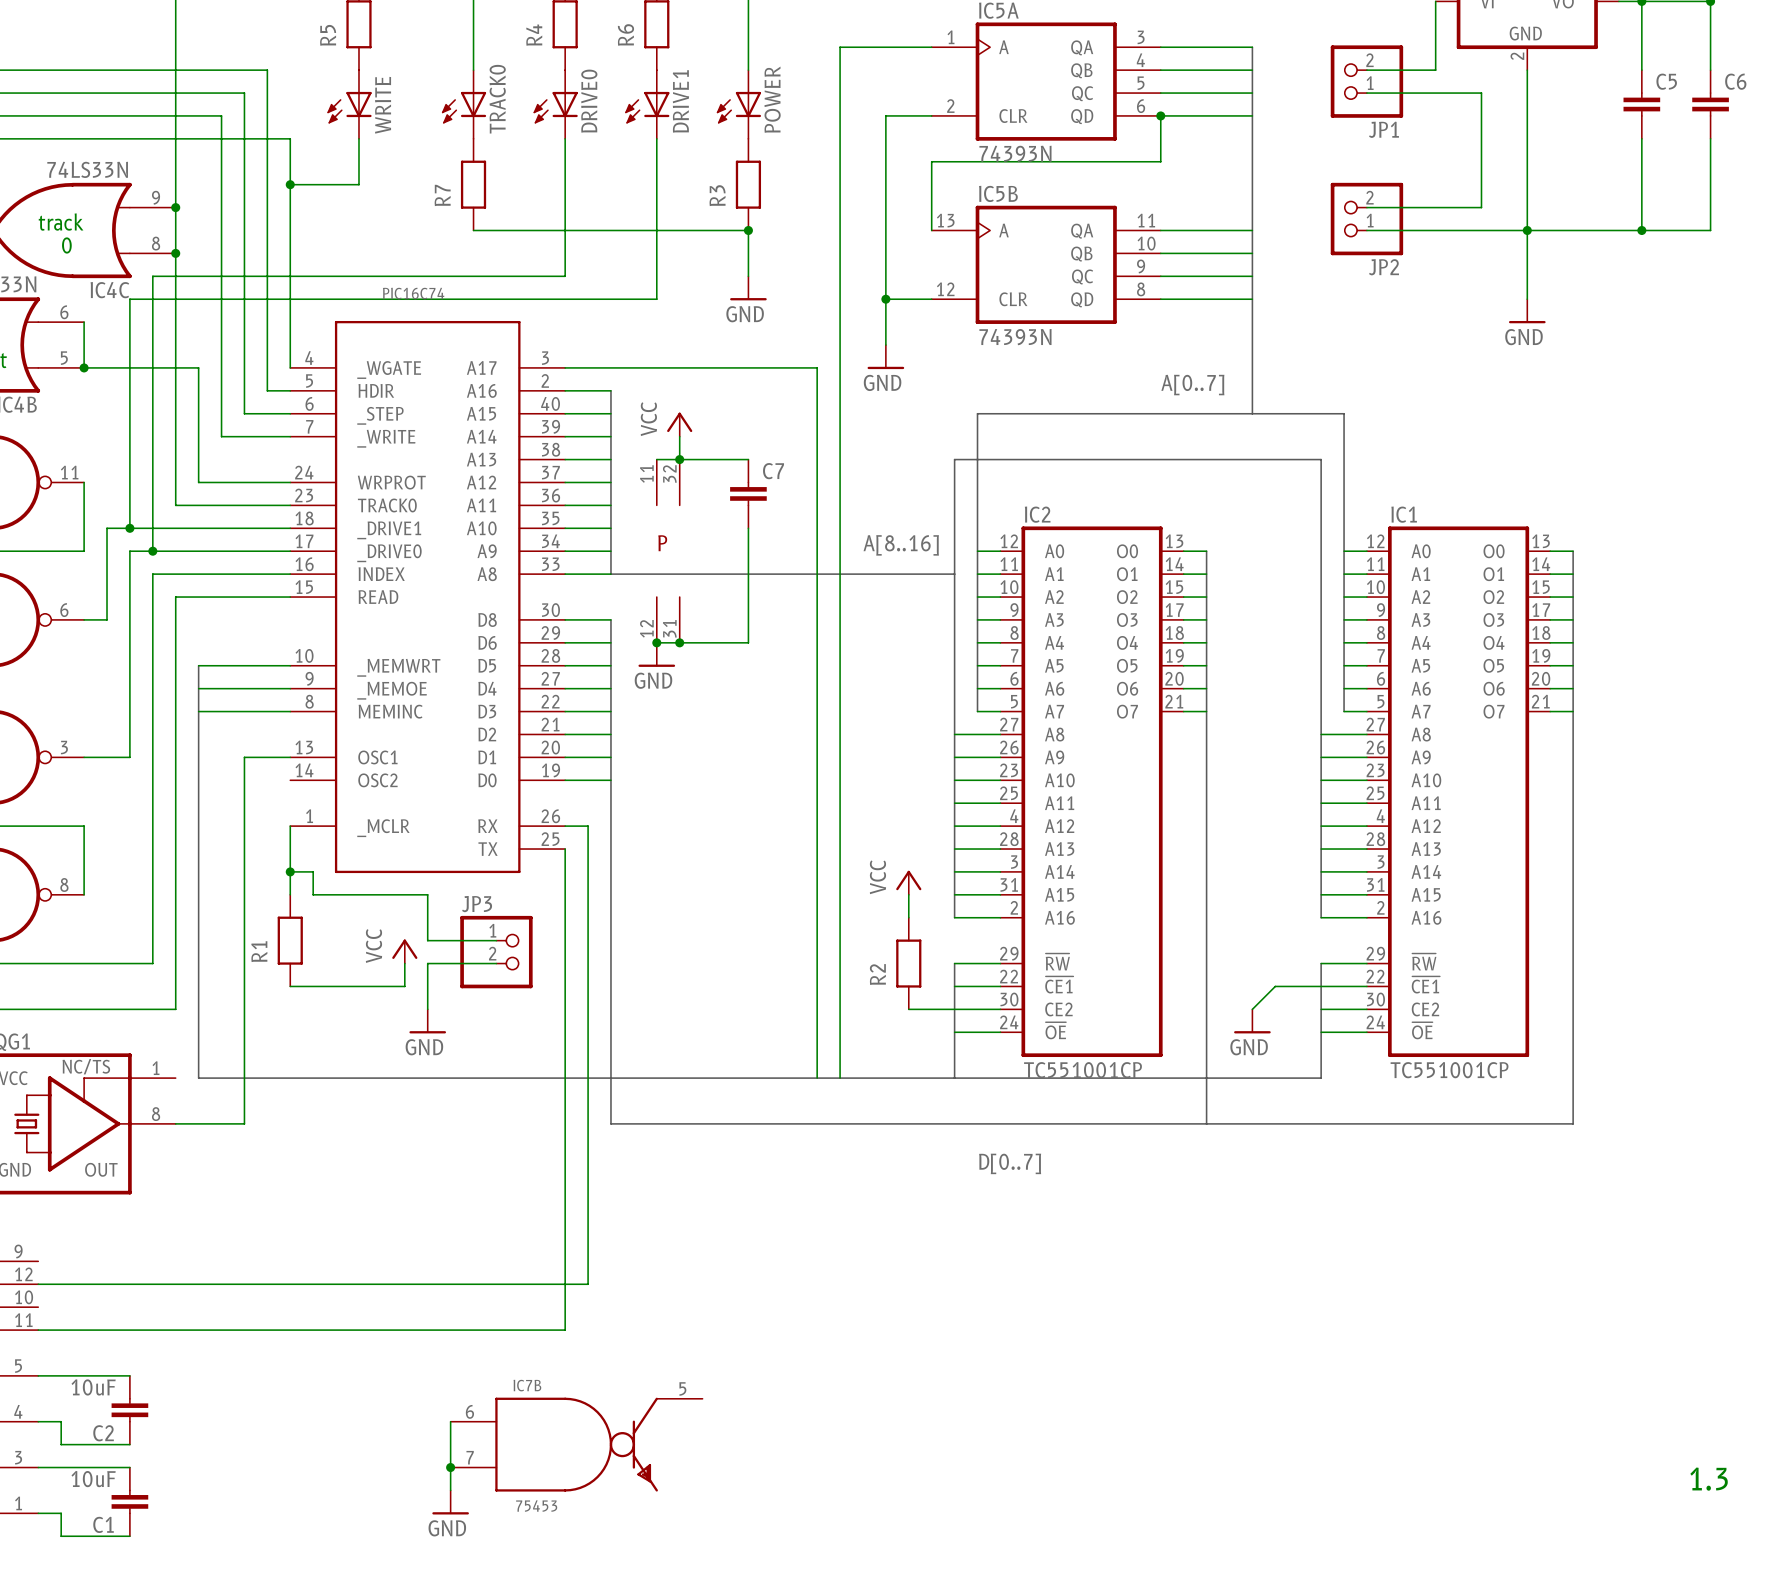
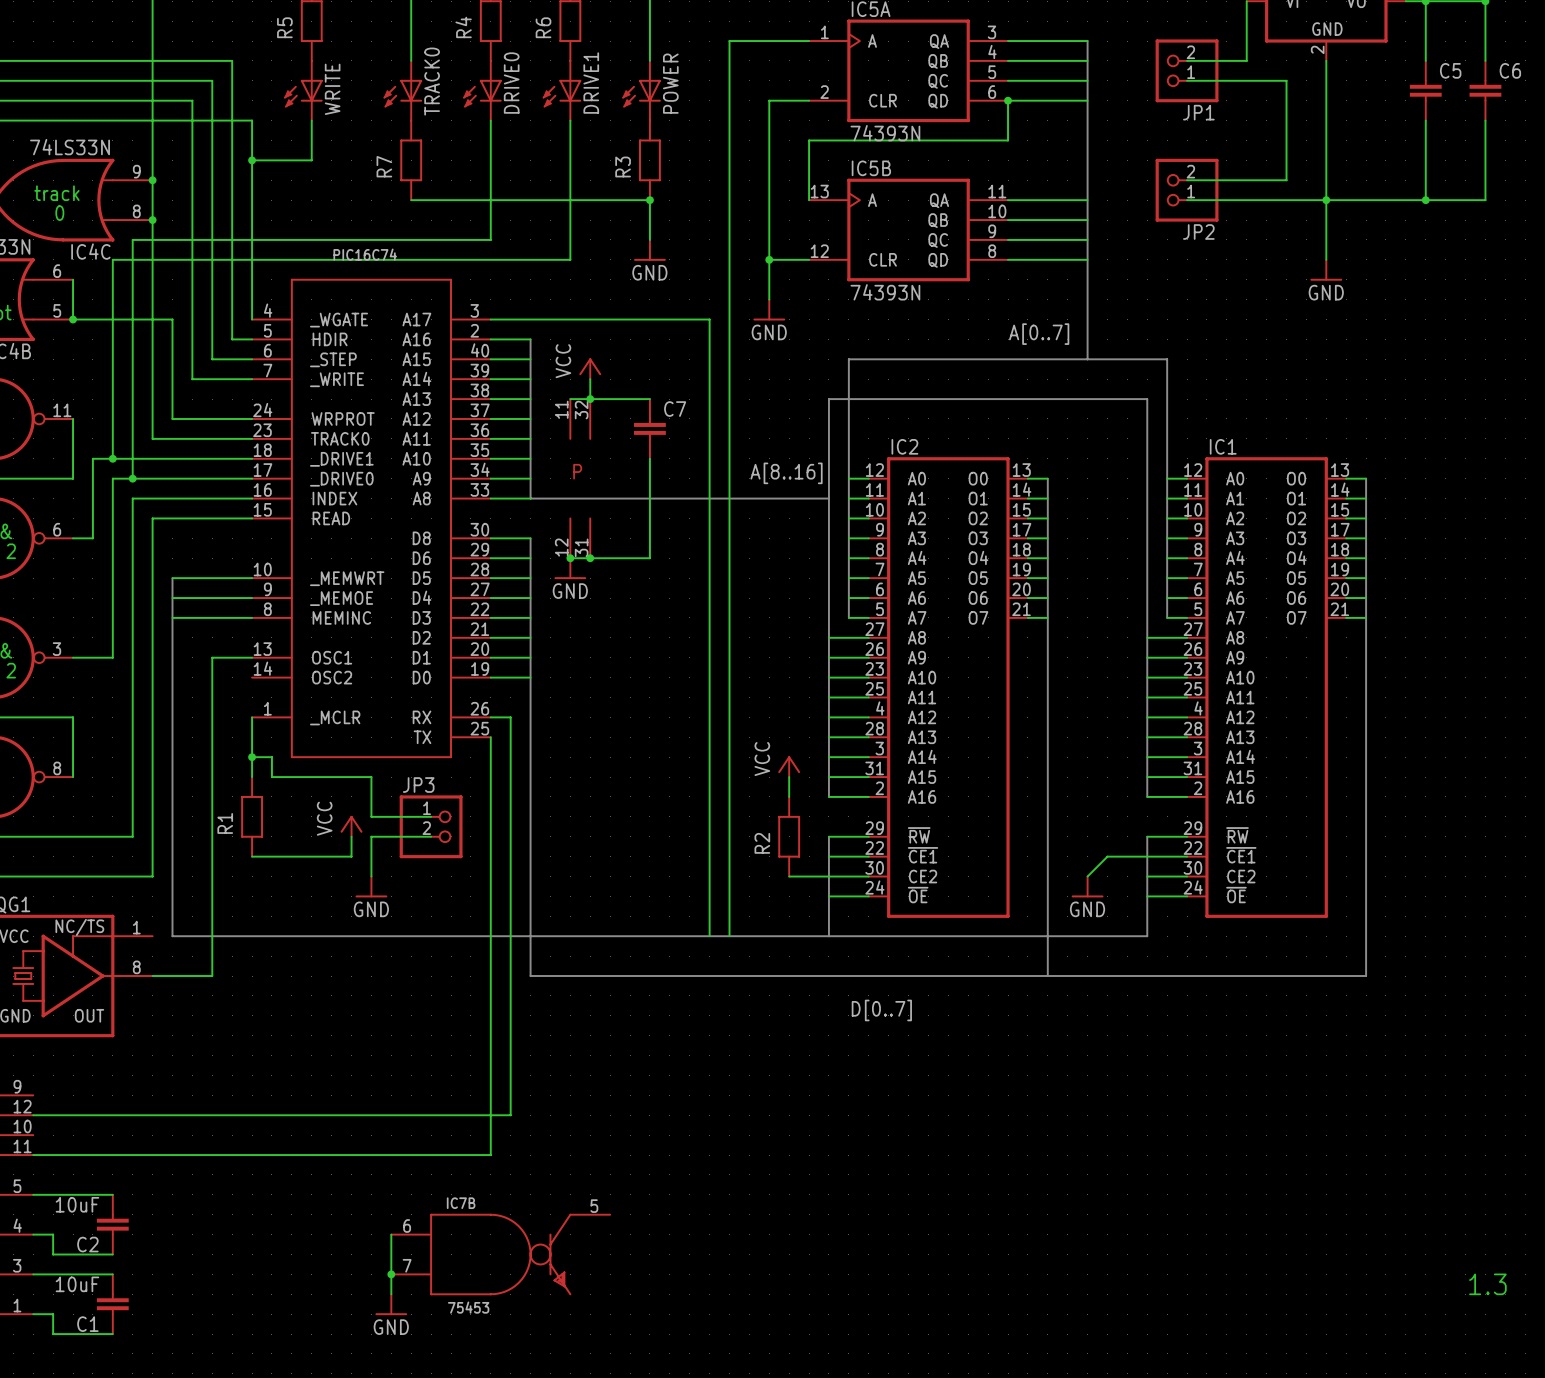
IC2 value: TC551001CP (1083, 1070) -> none
IC1 value: TC551001CP (1449, 1070) -> none

